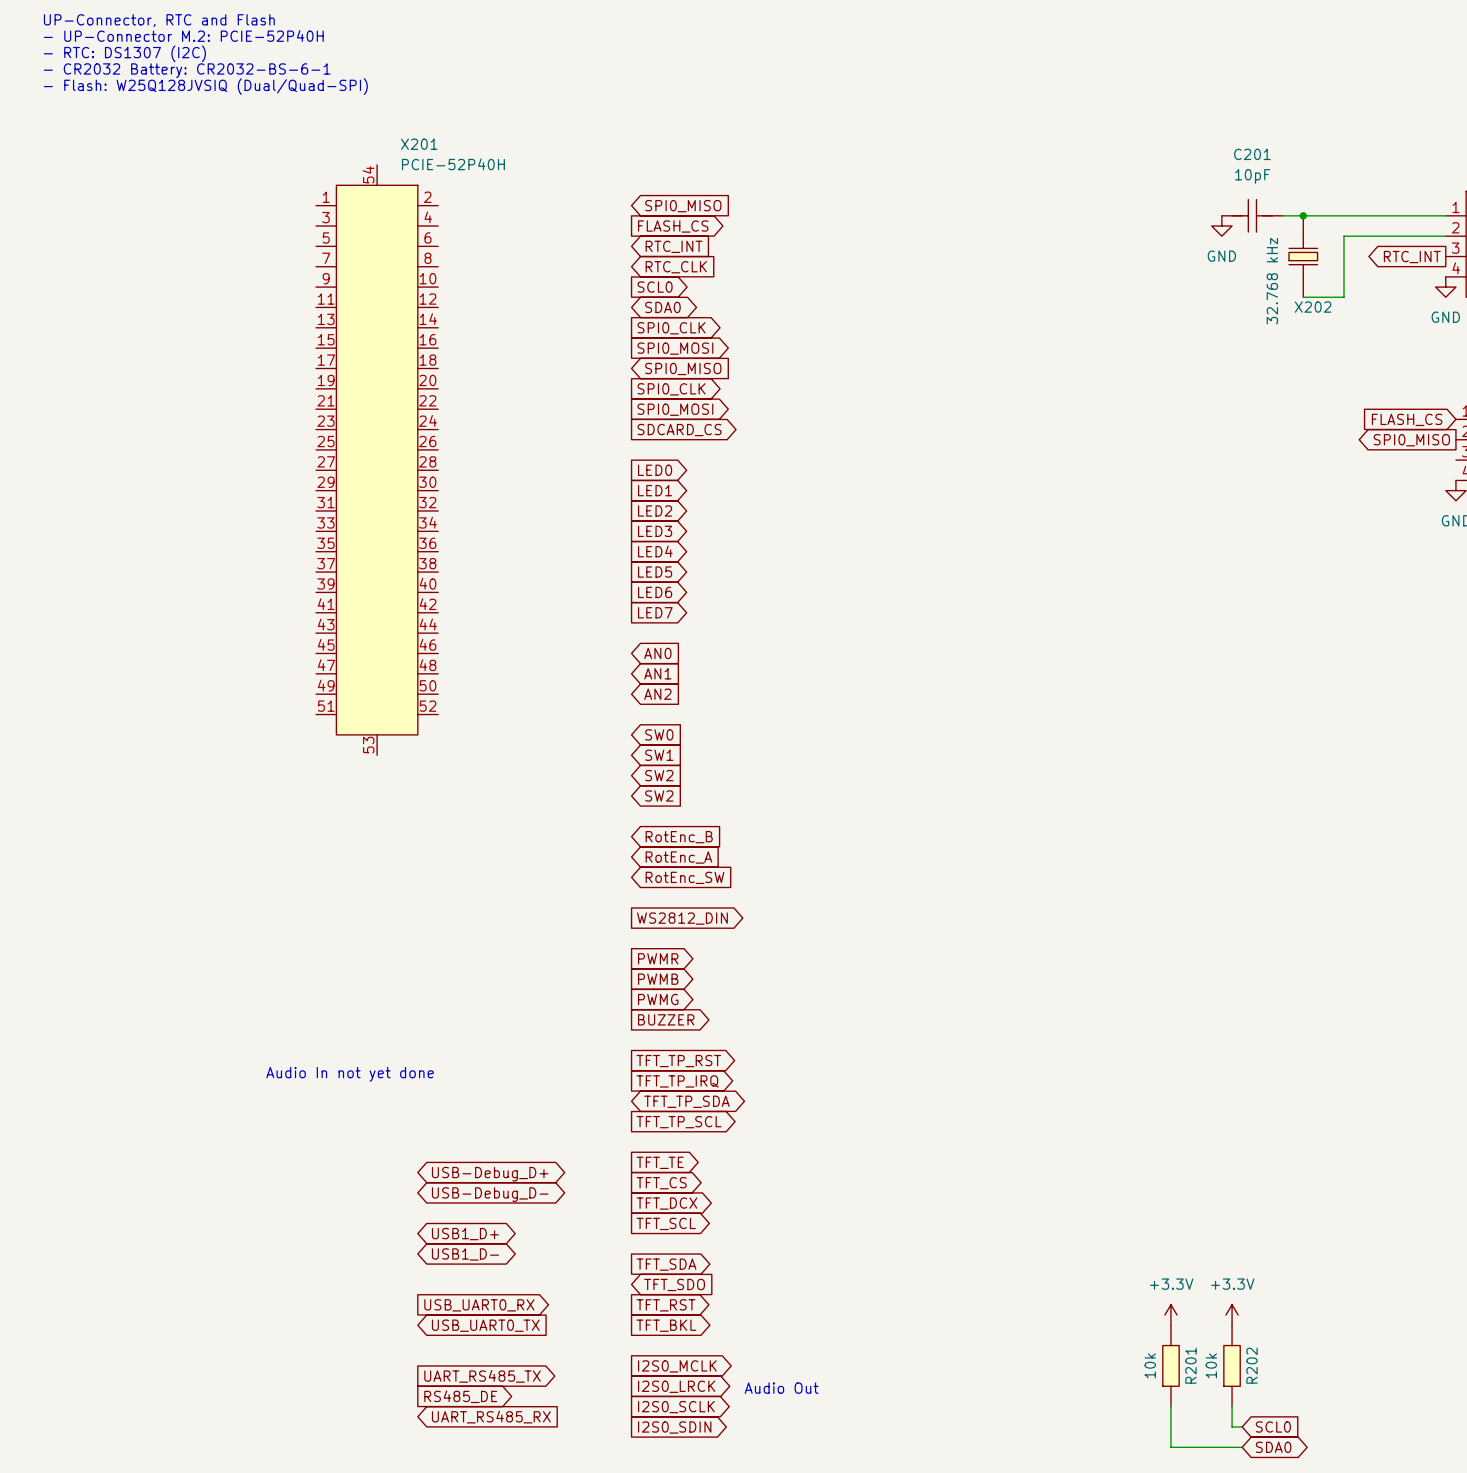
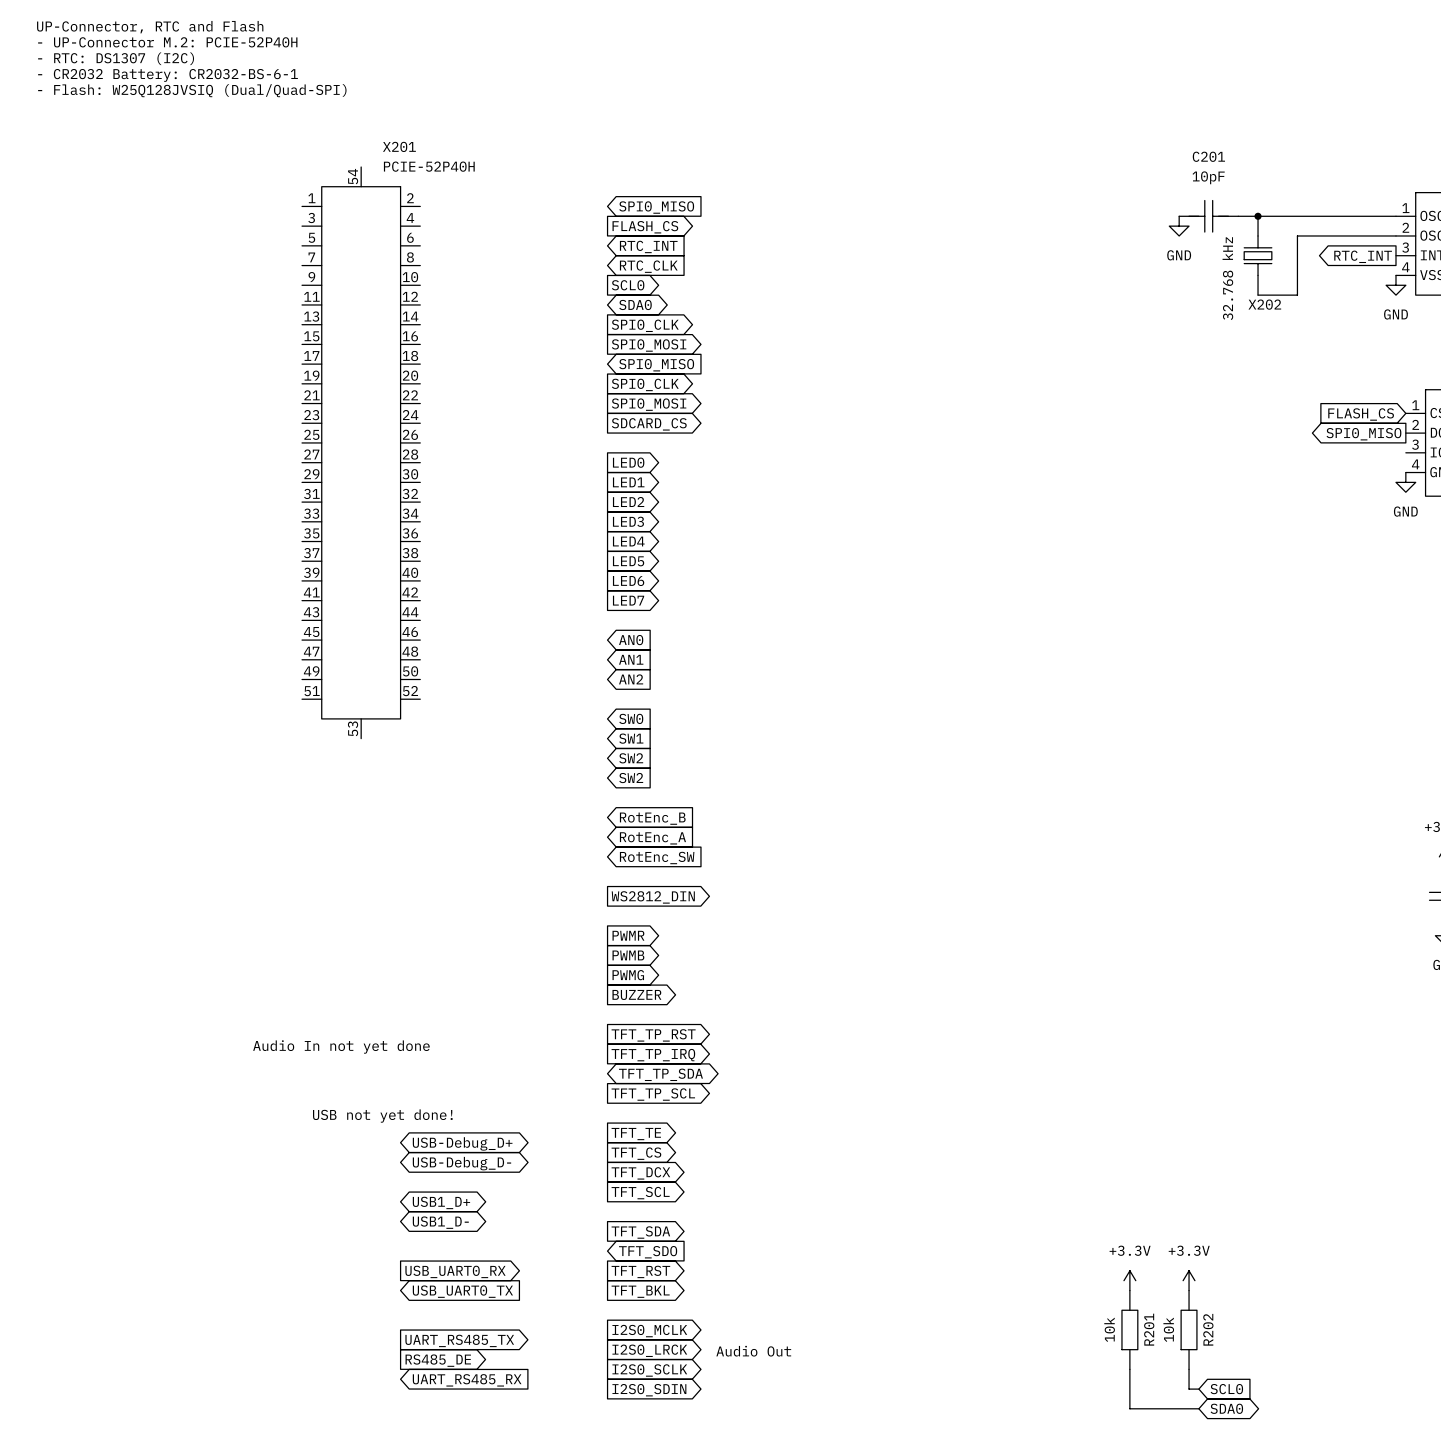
text: none -> USB not yet done! (382, 1116)

